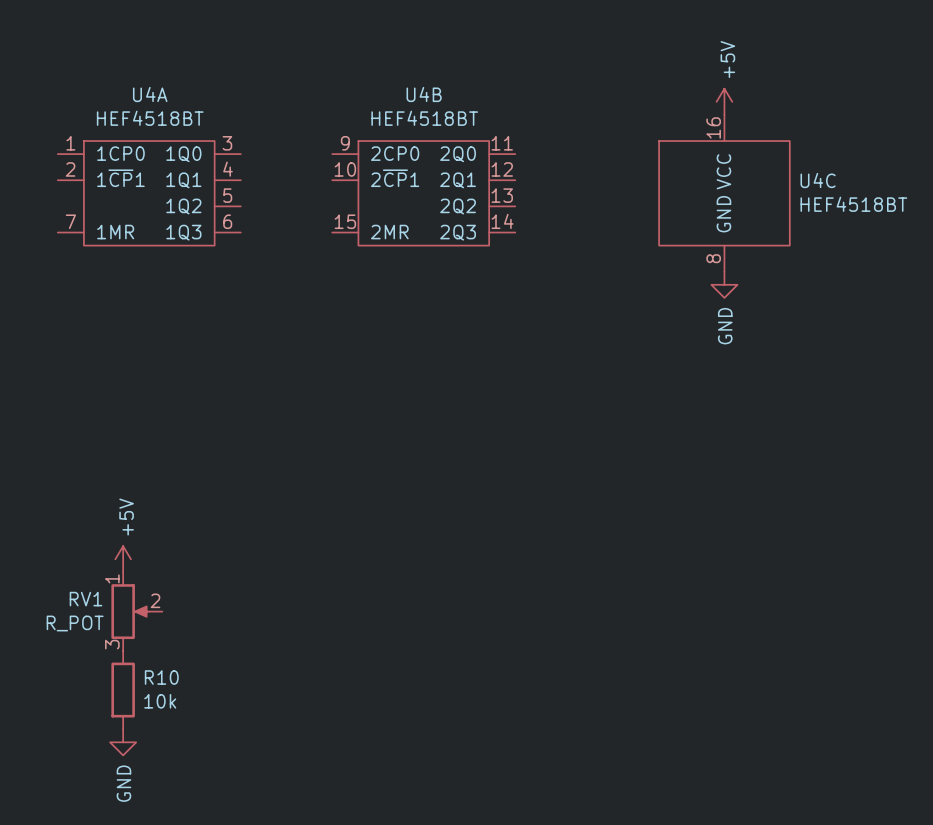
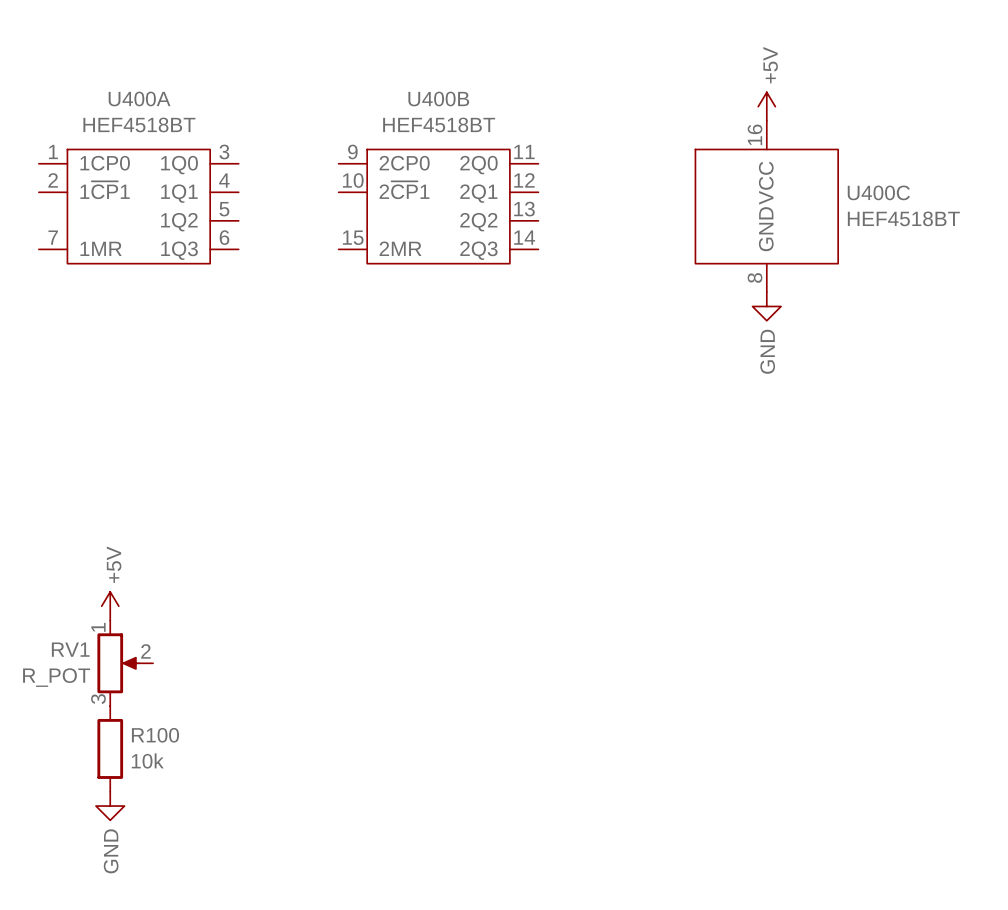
U4A name: U4A (150, 94) -> U400A (139, 98)
U4B name: U4B (424, 94) -> U400B (438, 98)
U4C name: U4C (818, 180) -> U400C (878, 192)
R10 name: R10 (161, 677) -> R100 (155, 735)

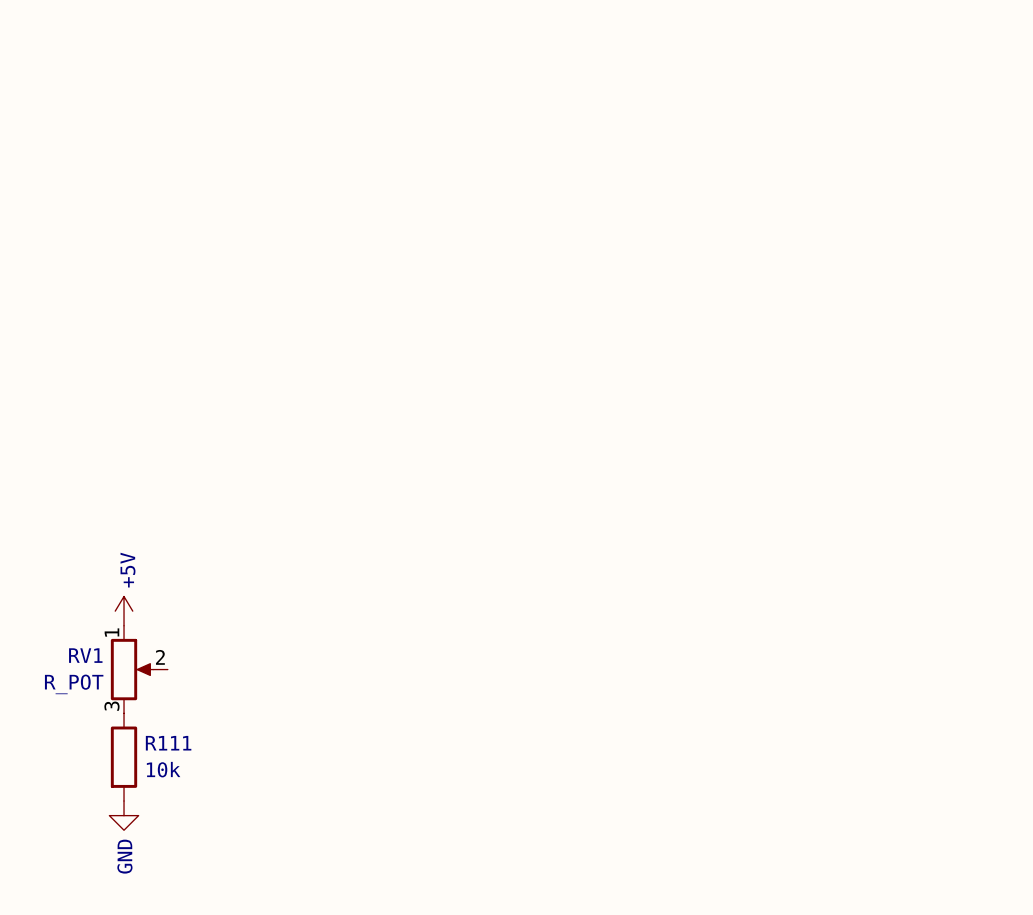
power symbol: +5V (766, 106) -> none
U400A: HEF4518BT (138, 206) -> none
U400B: HEF4518BT (438, 206) -> none
U400C: HEF4518BT (766, 206) -> none
power symbol: GND (766, 306) -> none
R100 name: R100 (155, 735) -> R111 (168, 743)

